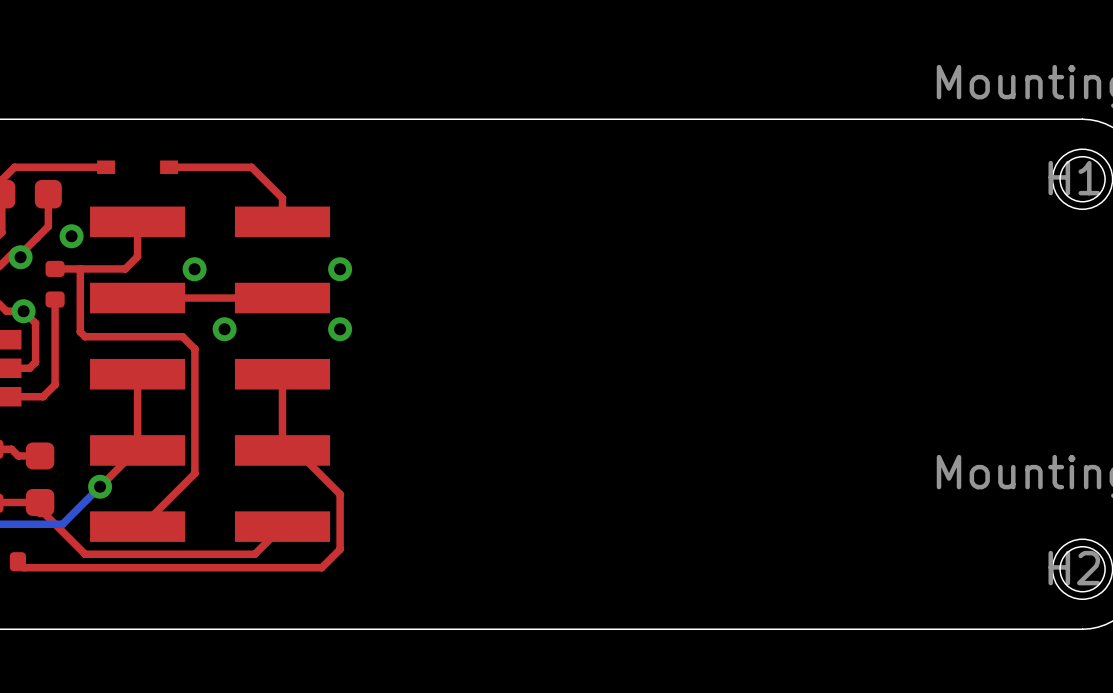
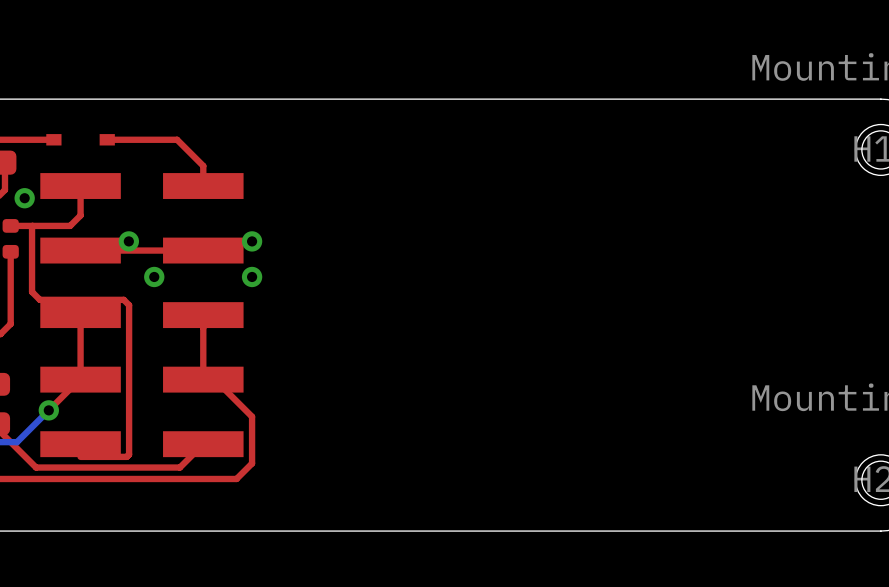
via position: (194, 269) -> (128, 241)
via position: (340, 269) -> (252, 241)
top track: (80, 331) (85, 336) (182, 336) (194, 349) (194, 362) -> (32, 279) (32, 291) (39, 299) (123, 299) (129, 305)
top track: (194, 473) (141, 526) (137, 526) -> (129, 399) (129, 454) (126, 456) (80, 456)

